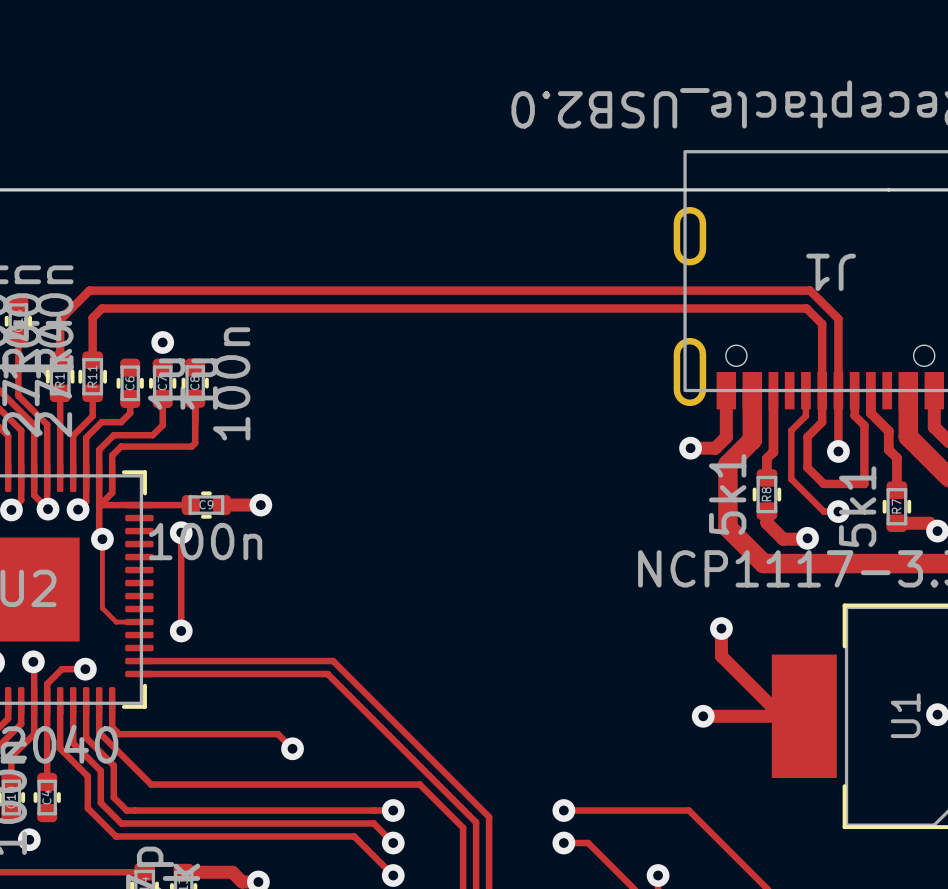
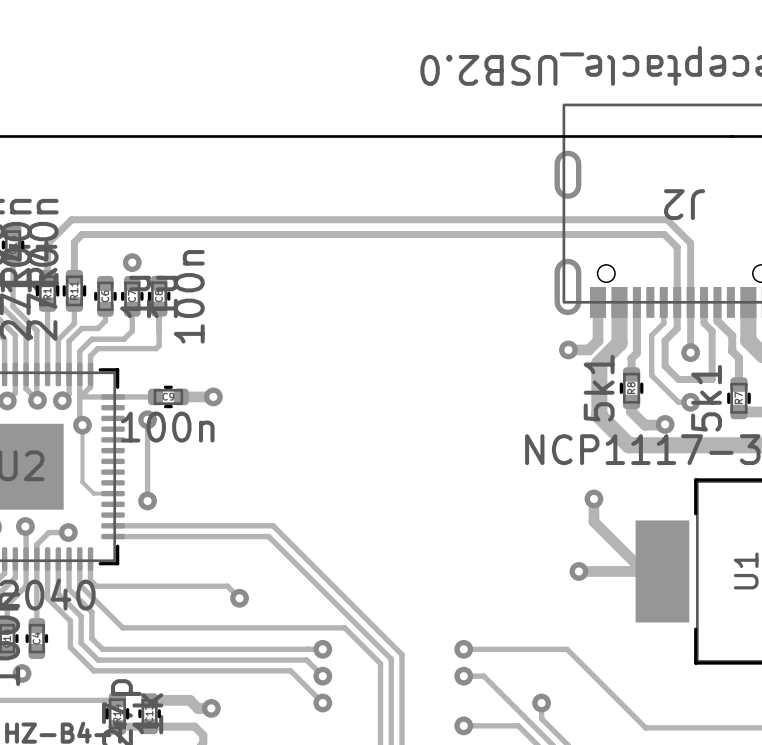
J1 name: J1 (831, 272) -> J2 (684, 204)

